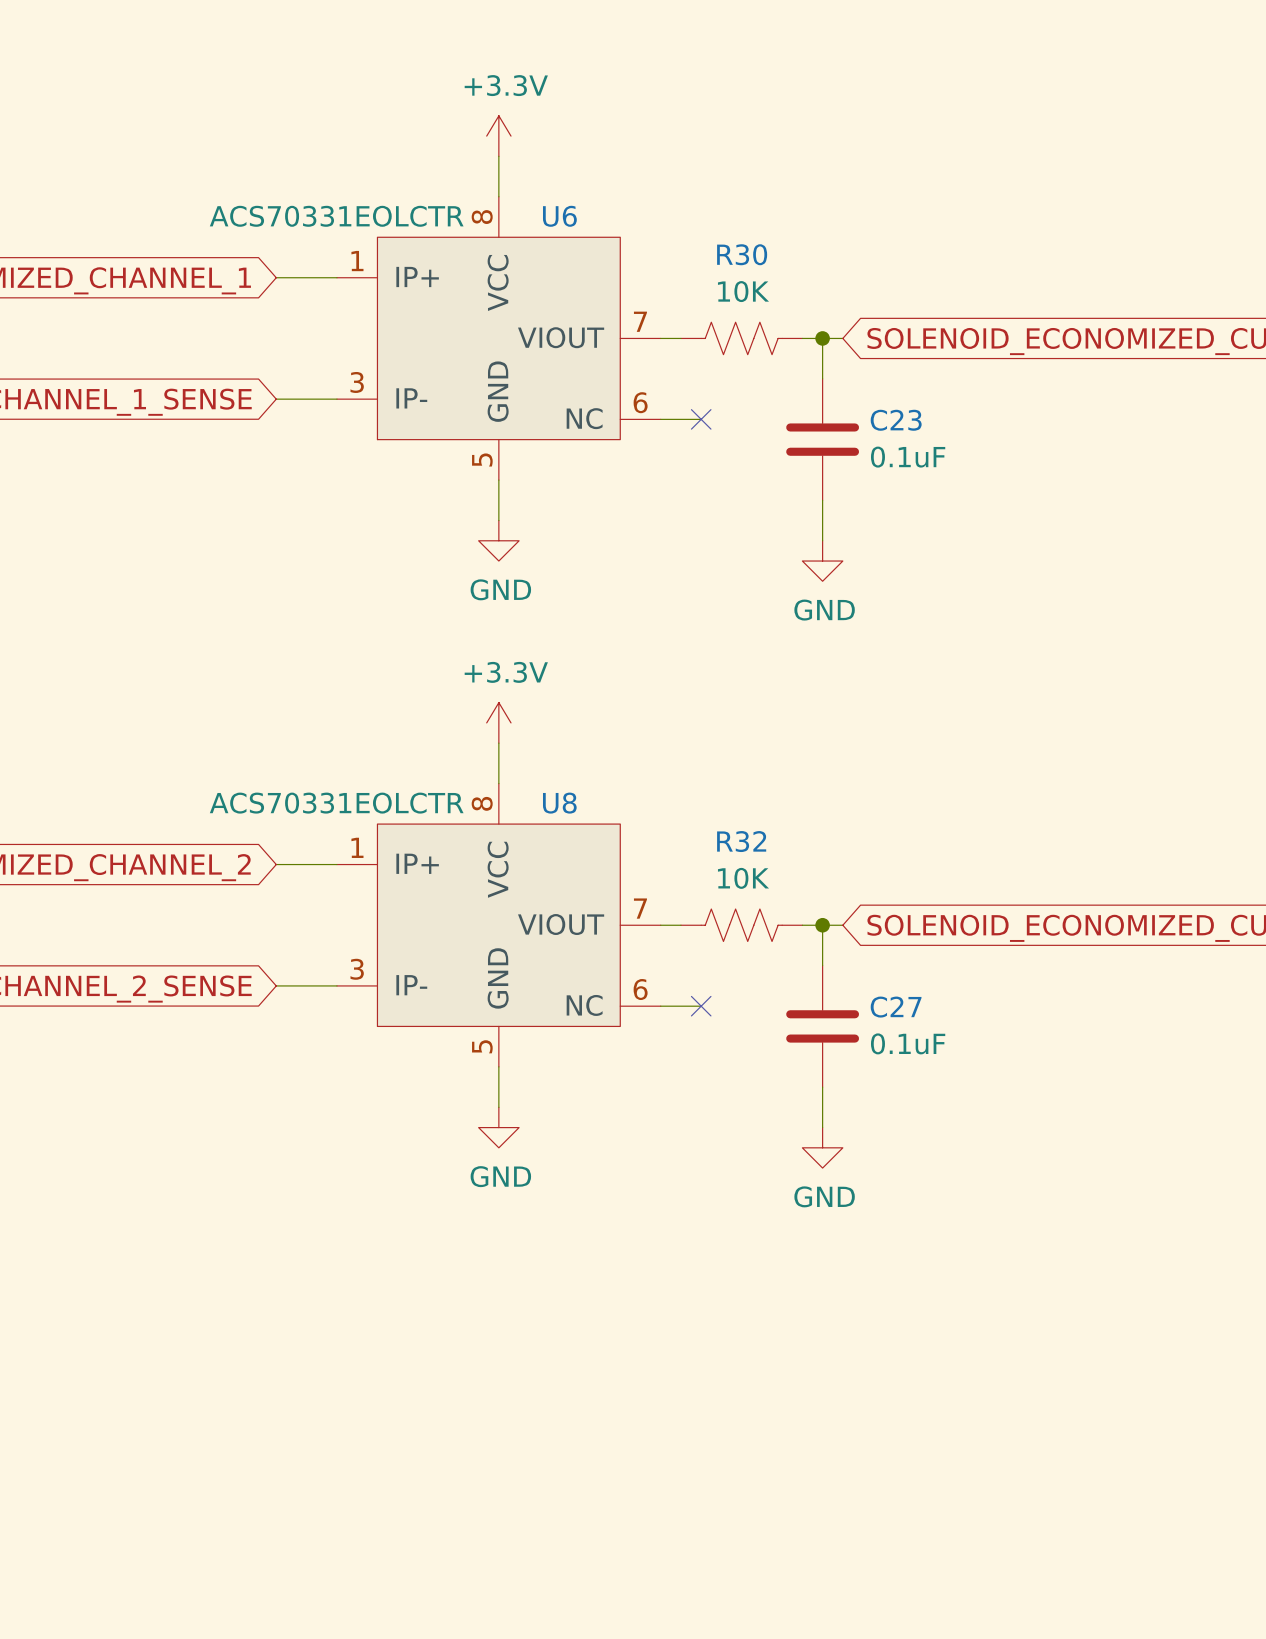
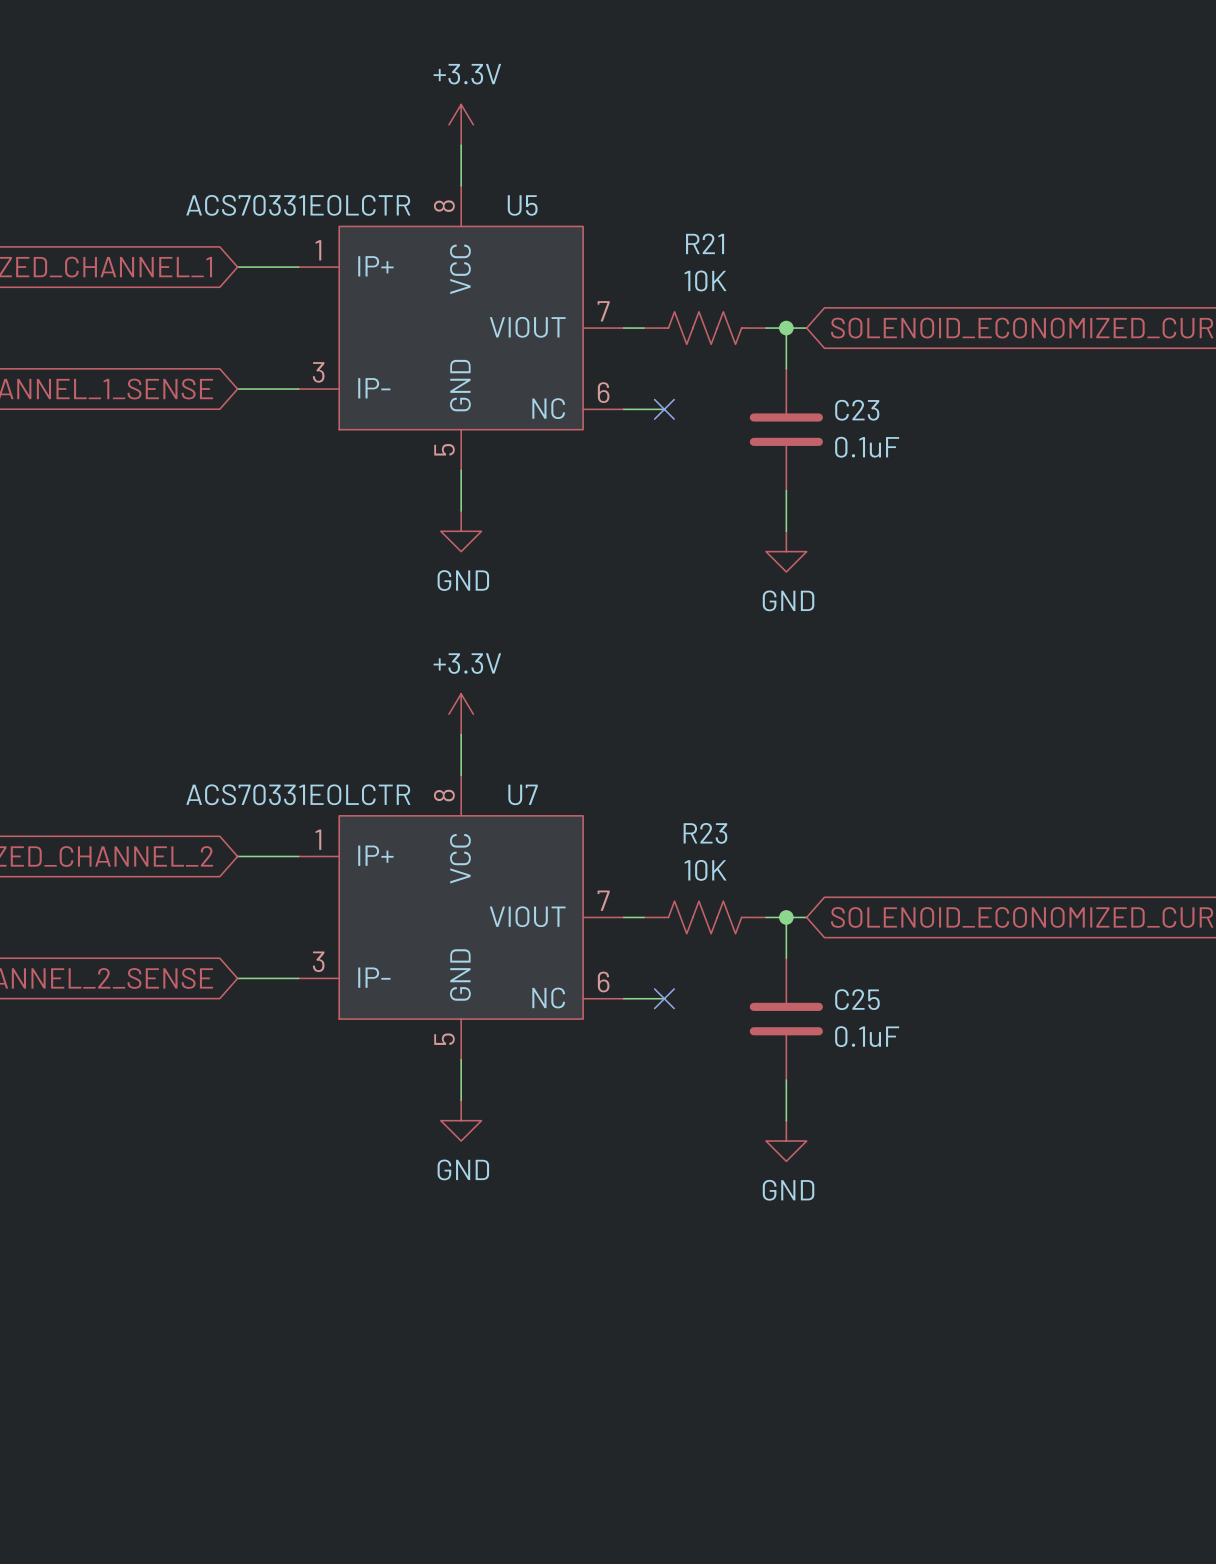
U6 name: U6 (559, 216) -> U5 (522, 205)
R30 name: R30 (742, 254) -> R21 (705, 243)
U8 name: U8 (559, 803) -> U7 (523, 794)
R32 name: R32 (741, 841) -> R23 (705, 833)
C27 name: C27 (896, 1007) -> C25 (857, 999)

